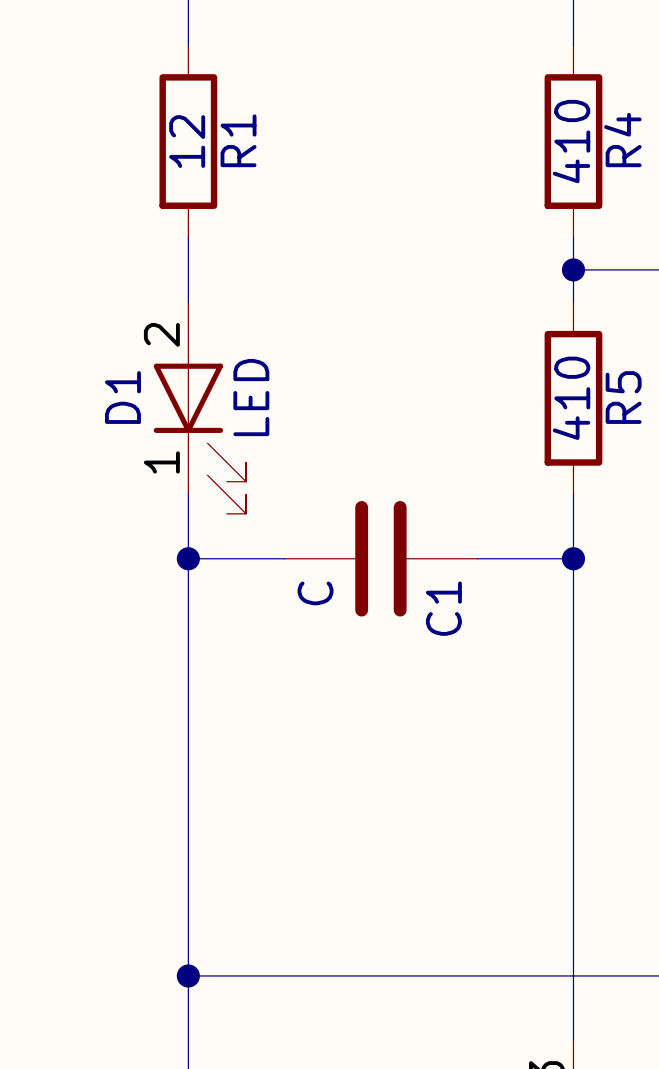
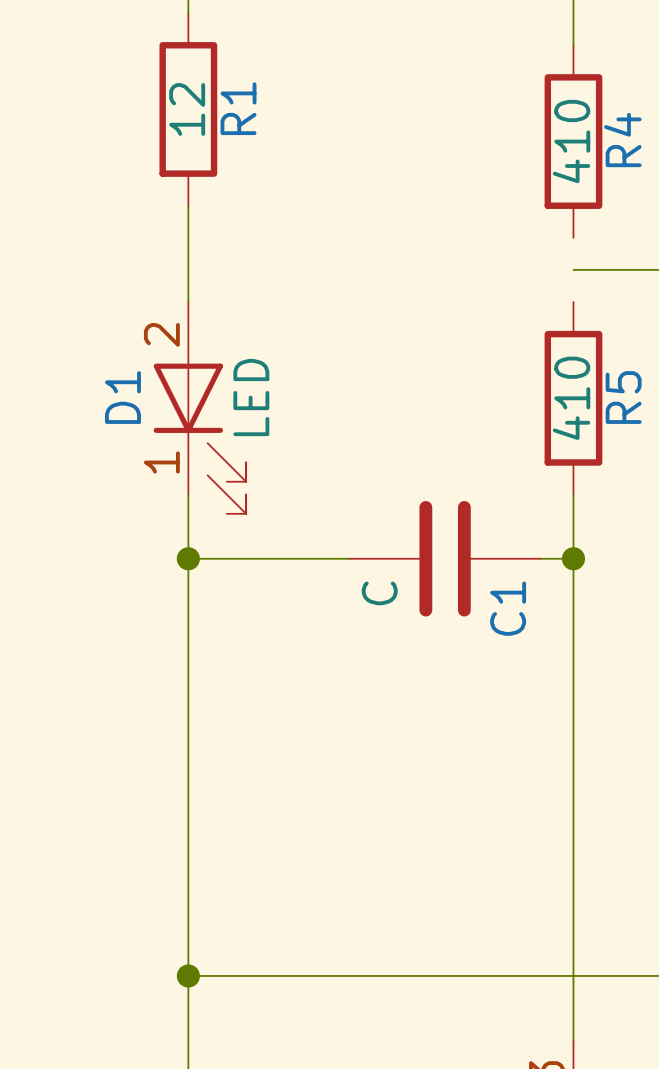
R1 position: (188, 141) -> (188, 109)
wire: (573, 237) (573, 302) -> none
junction: (573, 269) -> none
C1 position: (380, 558) -> (445, 558)

